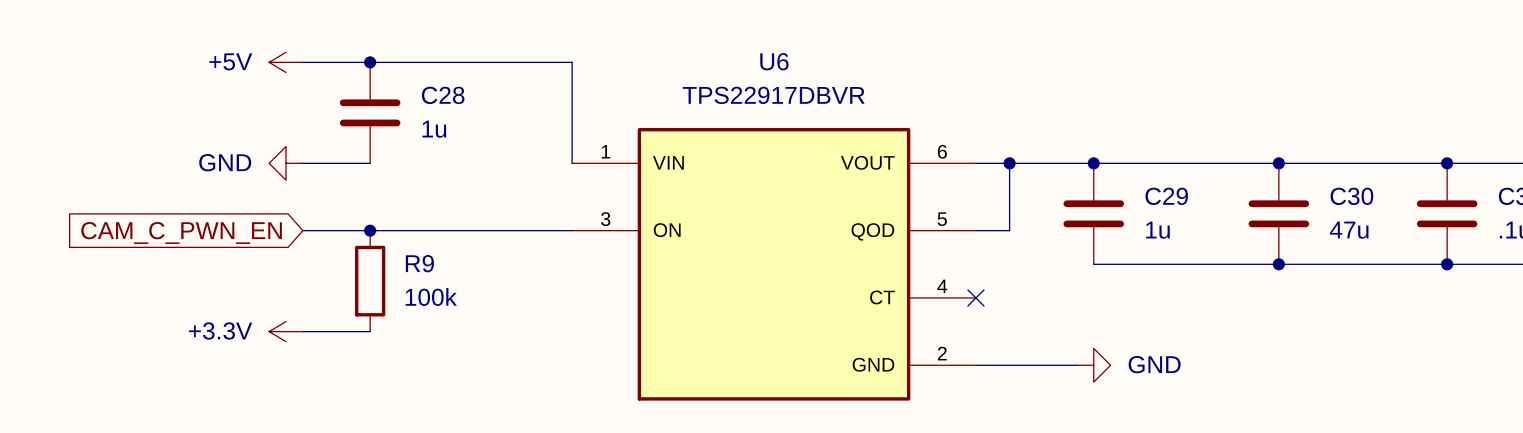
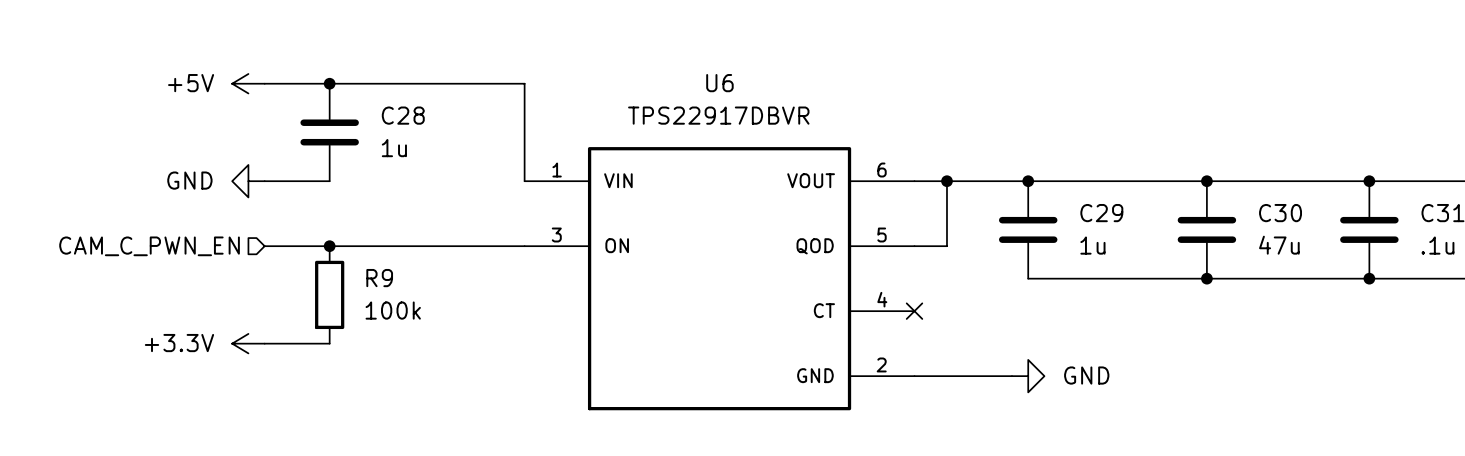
hierarchical label: none -> CAM_C_PWN_EN (149, 246)
global label: CAM_C_PWN_EN (181, 232) -> none

